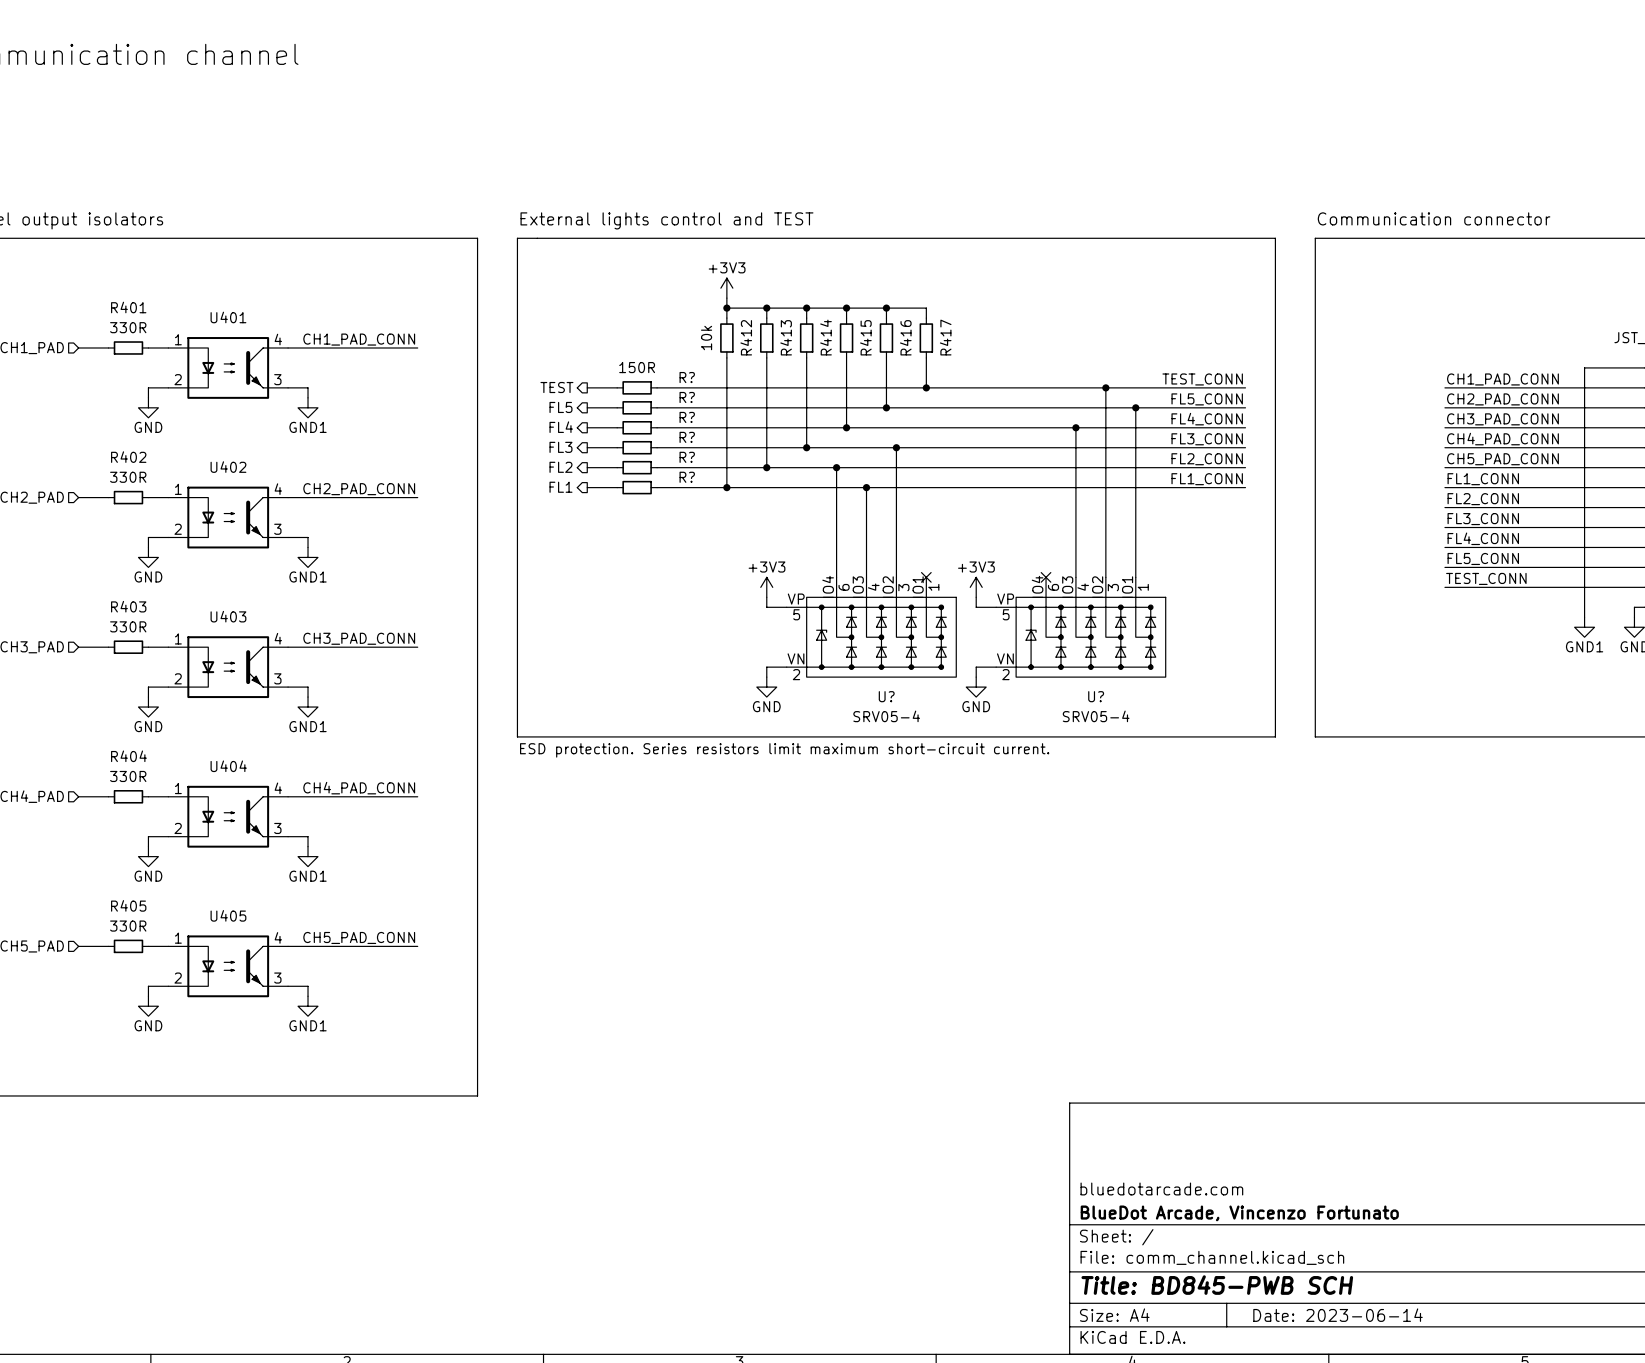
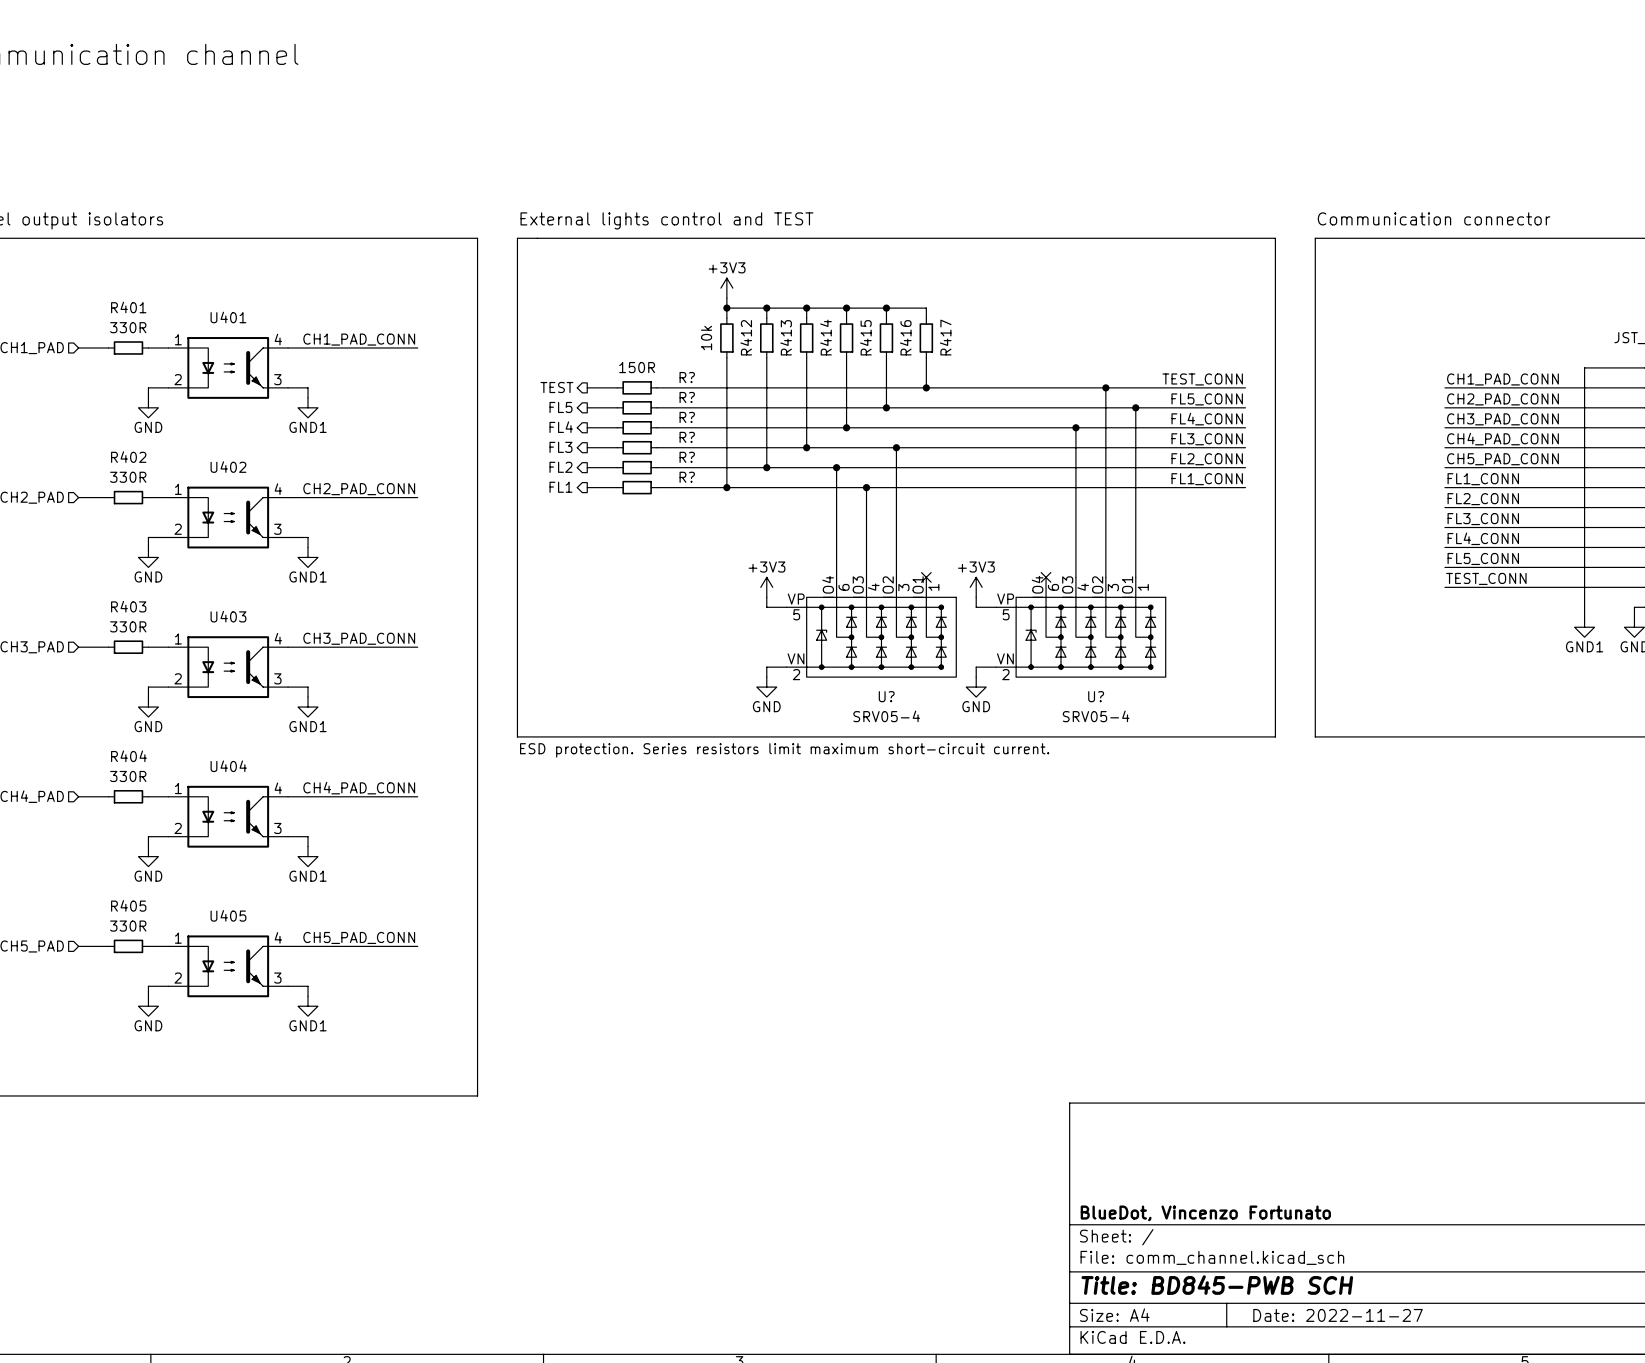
title block: bluedotarcade.com (1161, 1188) -> none
title block: BlueDot Arcade, Vincenzo Fortunato (1239, 1213) -> BlueDot, Vincenzo Fortunato (1205, 1213)
title block: Date: 2023-06-14 (1338, 1315) -> Date: 2022-11-27 (1338, 1315)

